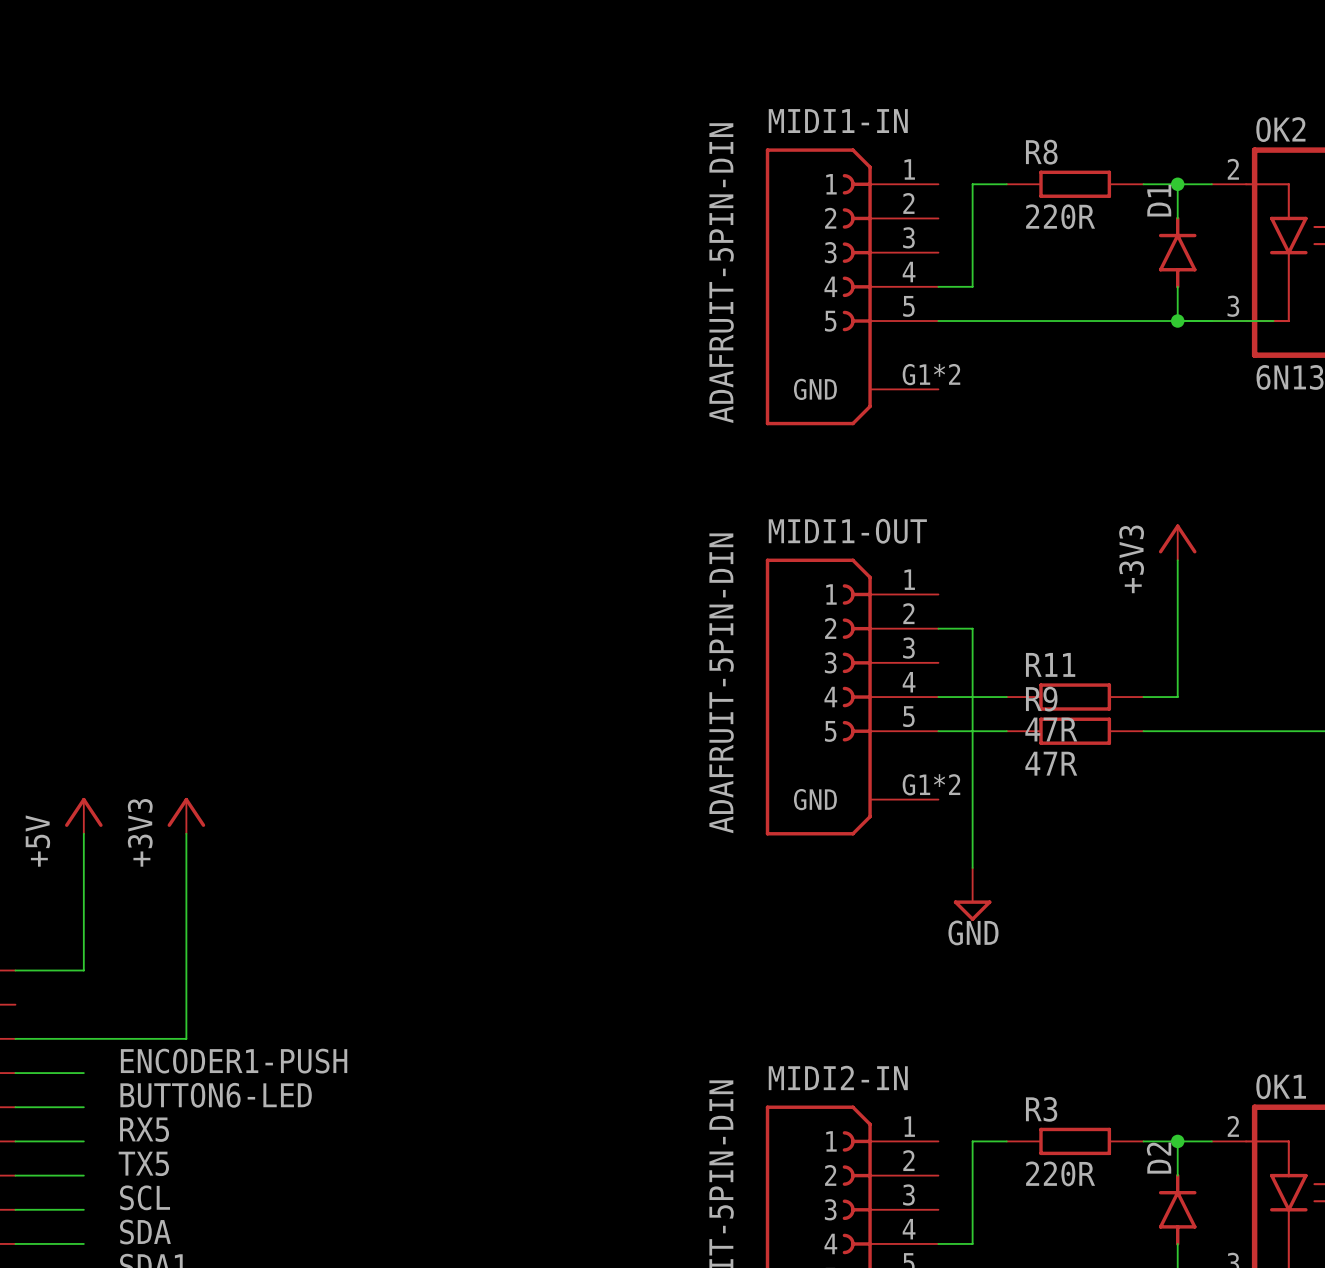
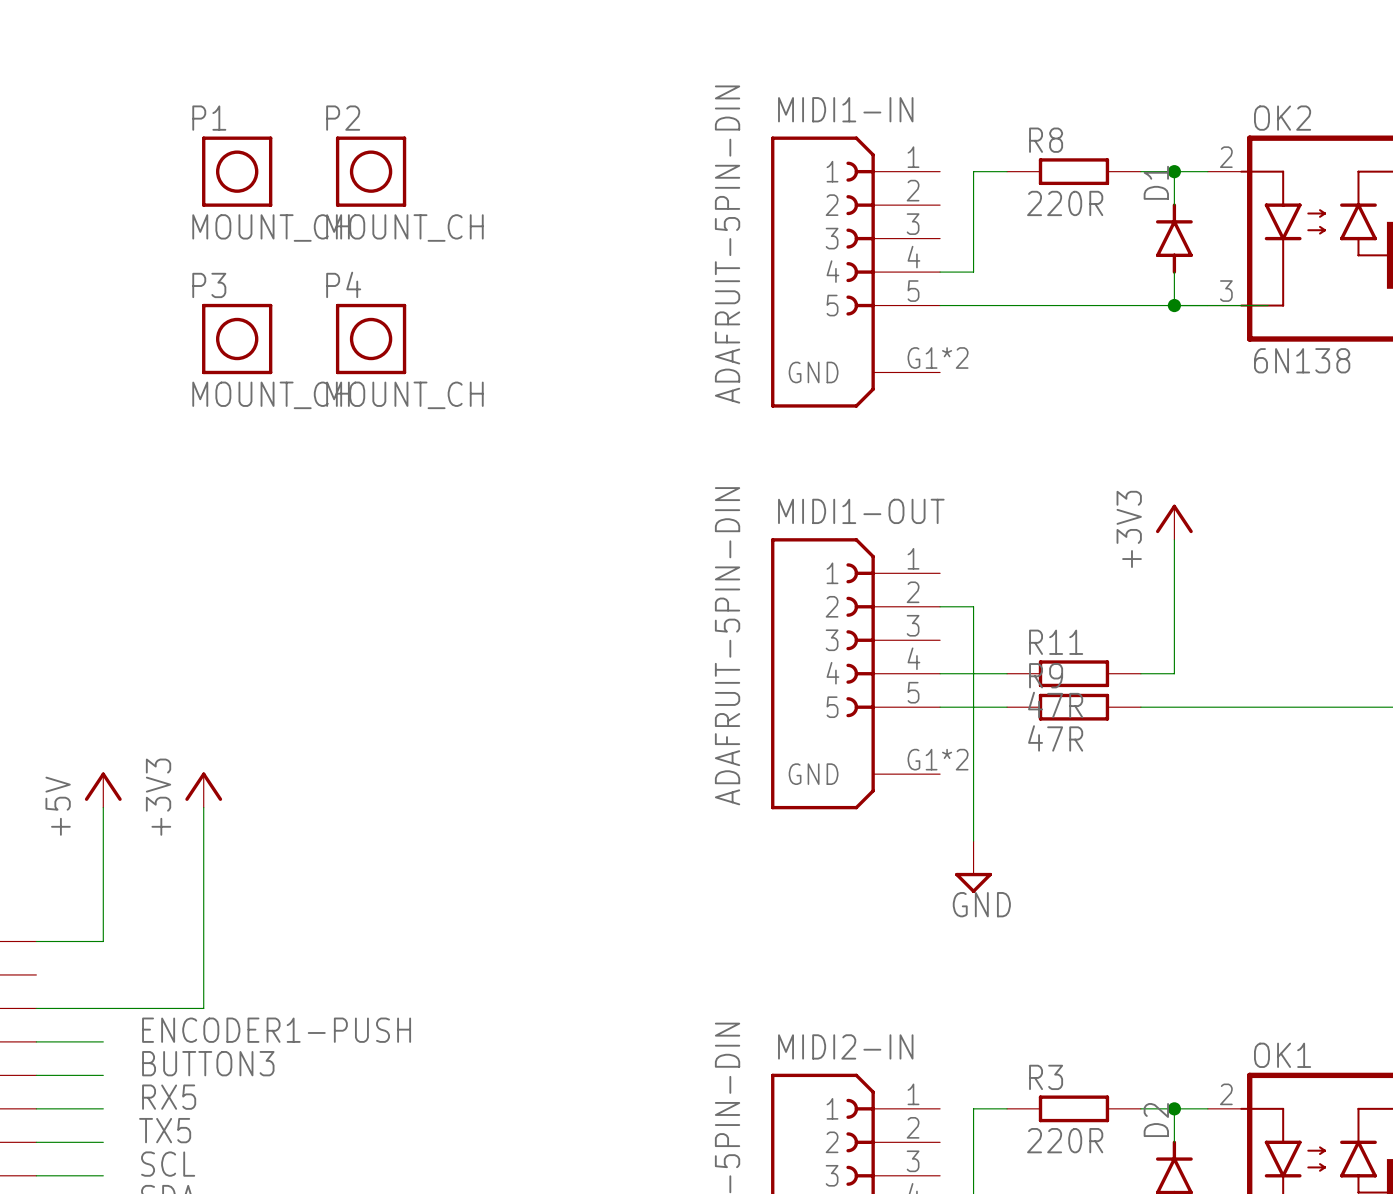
P1: none -> MOUNT_CH (237, 171)
P2: none -> MOUNT_CH (371, 171)
P3: none -> MOUNT_CH (237, 339)
P4: none -> MOUNT_CH (371, 339)
label: BUTTON6-LED (216, 1095) -> BUTTON3 (208, 1063)

